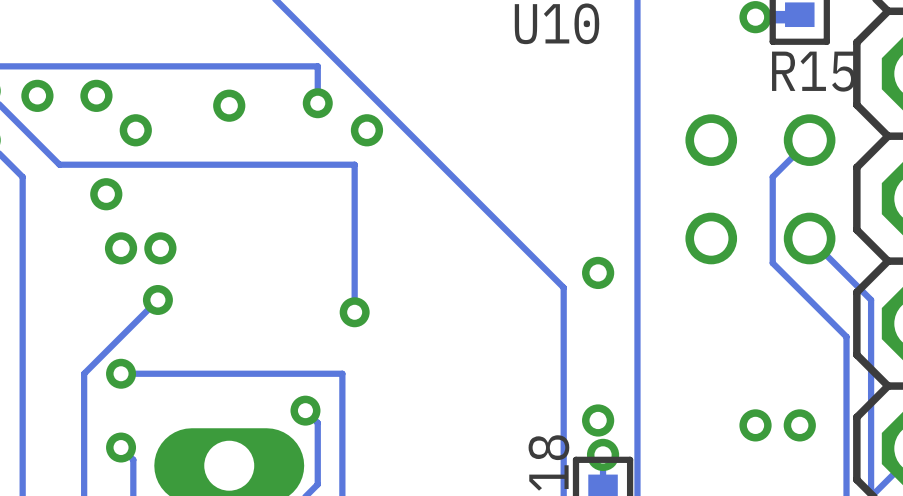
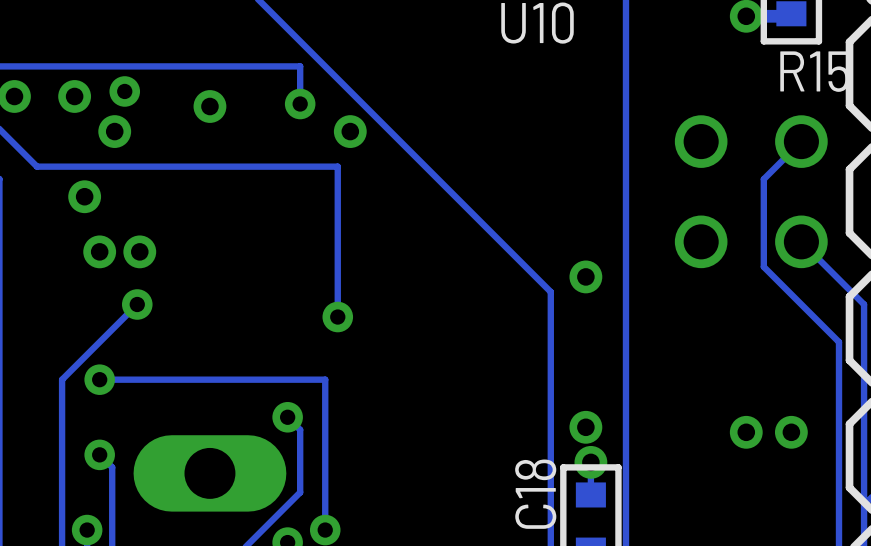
via: none -> (124, 91)

